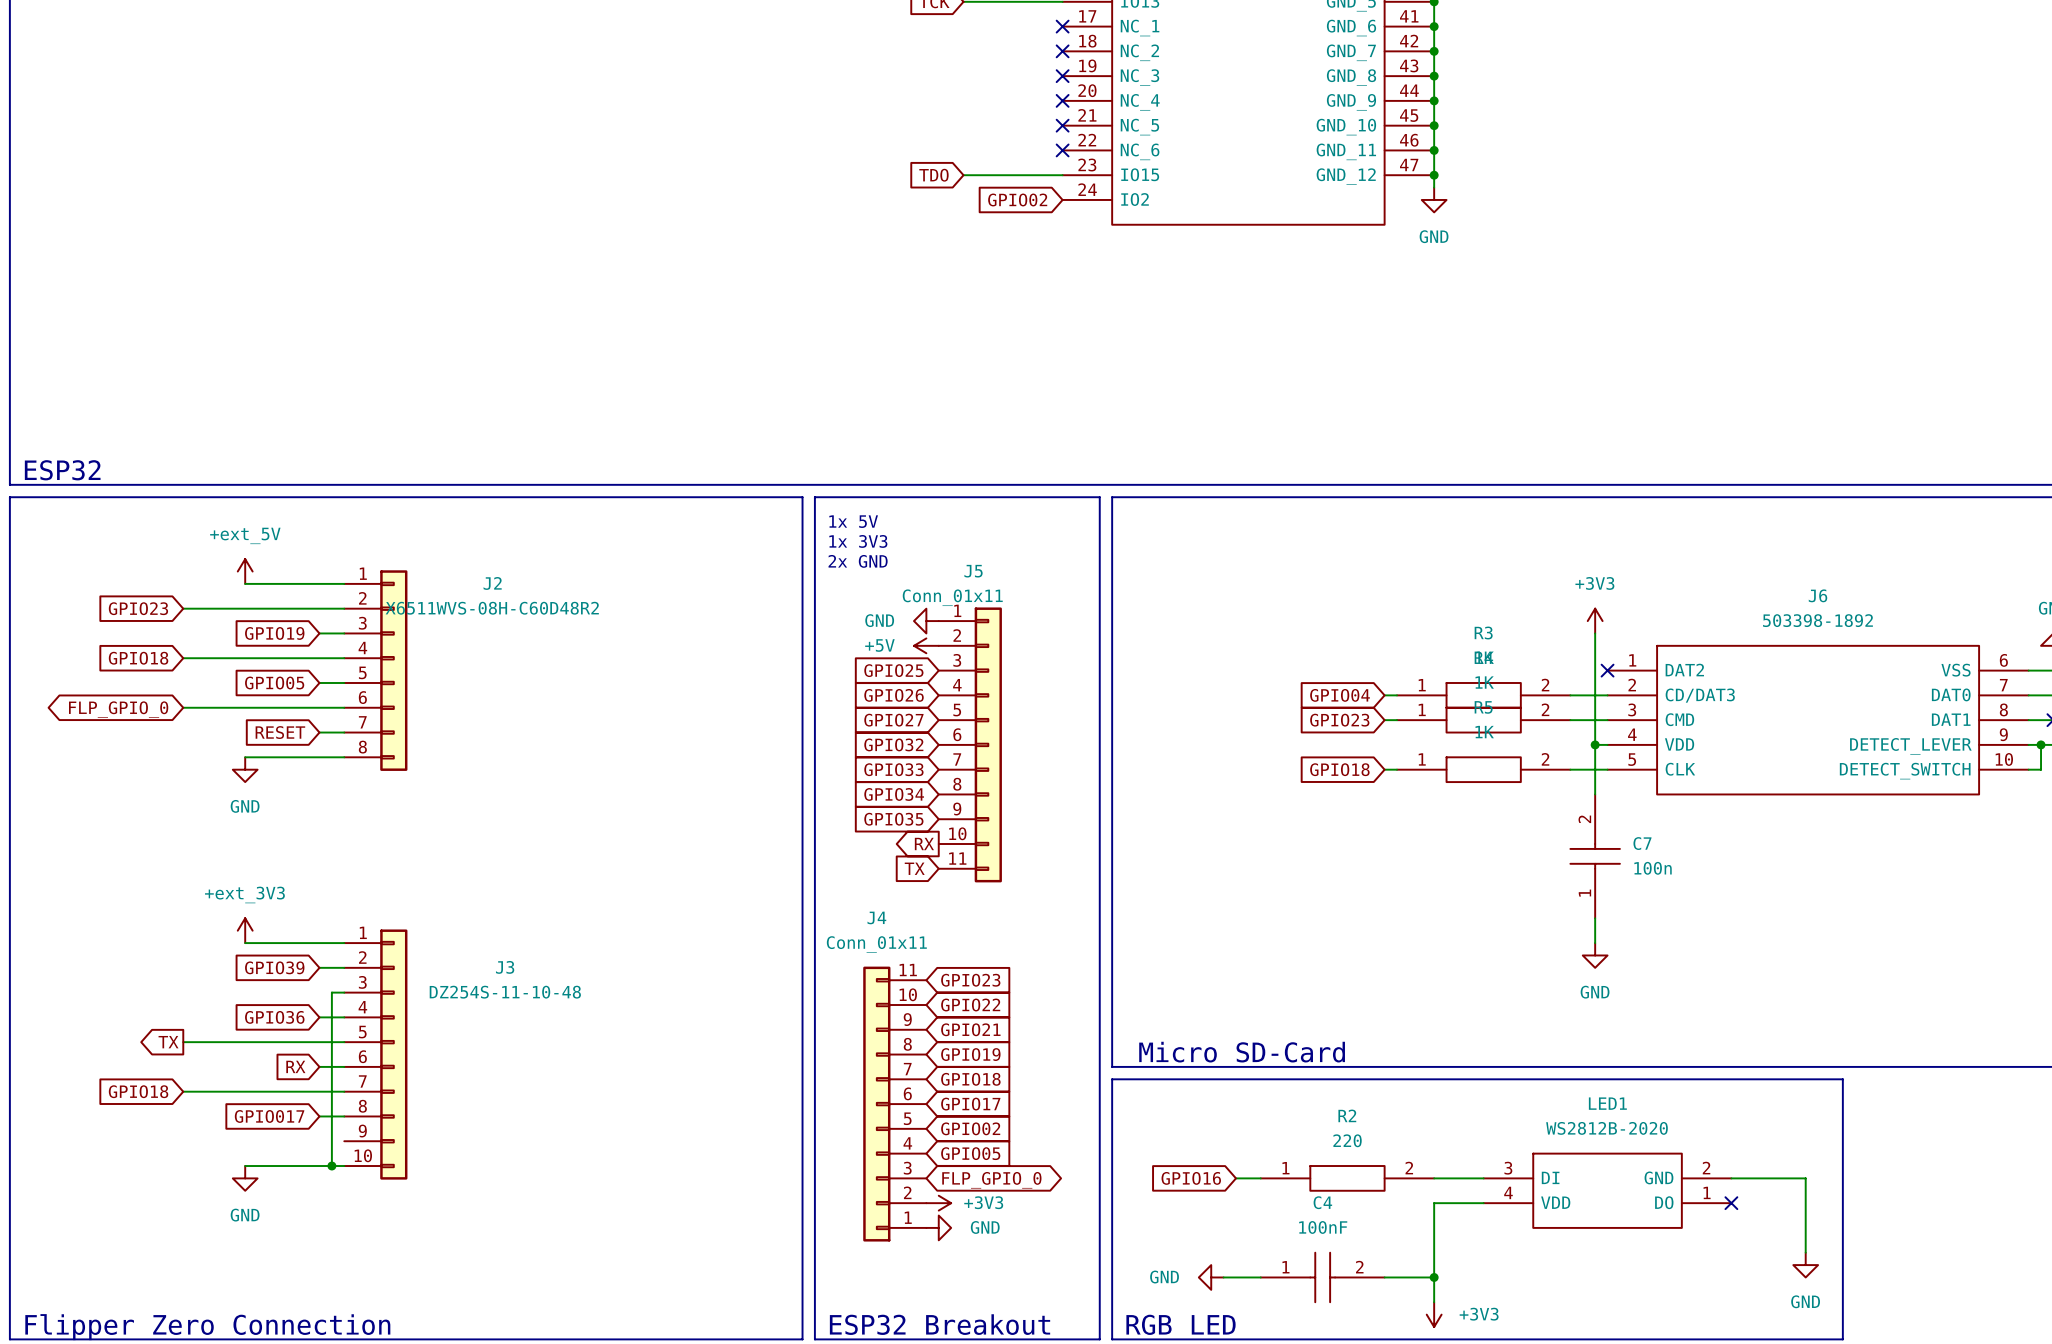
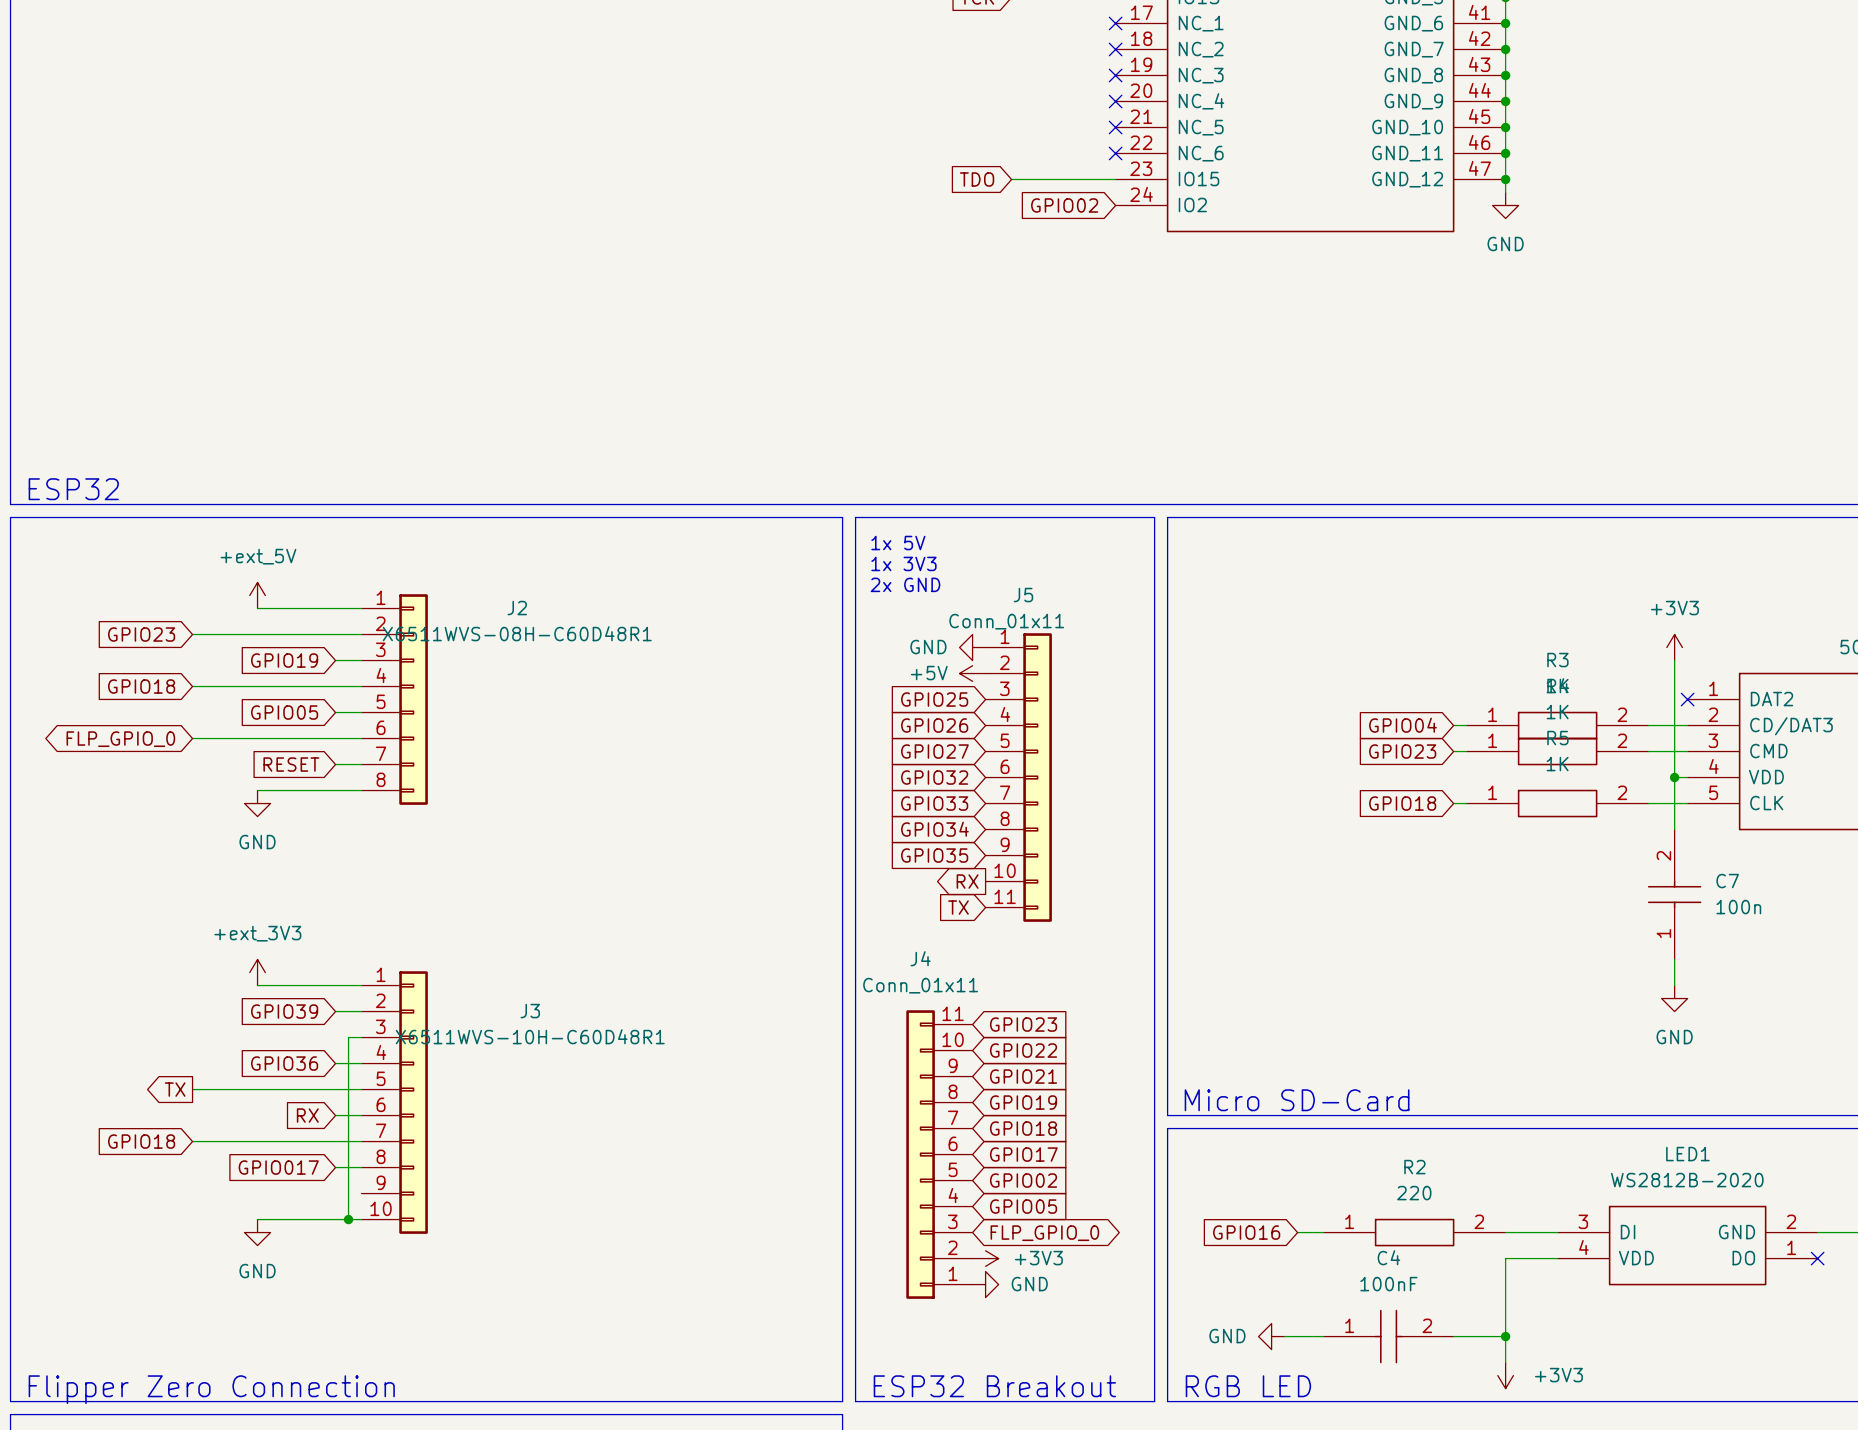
J2 value: X6511WVS-08H-C60D48R2 (492, 608) -> X6511WVS-08H-C60D48R1 (517, 633)
J3 value: DZ254S-11-10-48 (505, 992) -> X6511WVS-10H-C60D48R1 (530, 1036)

